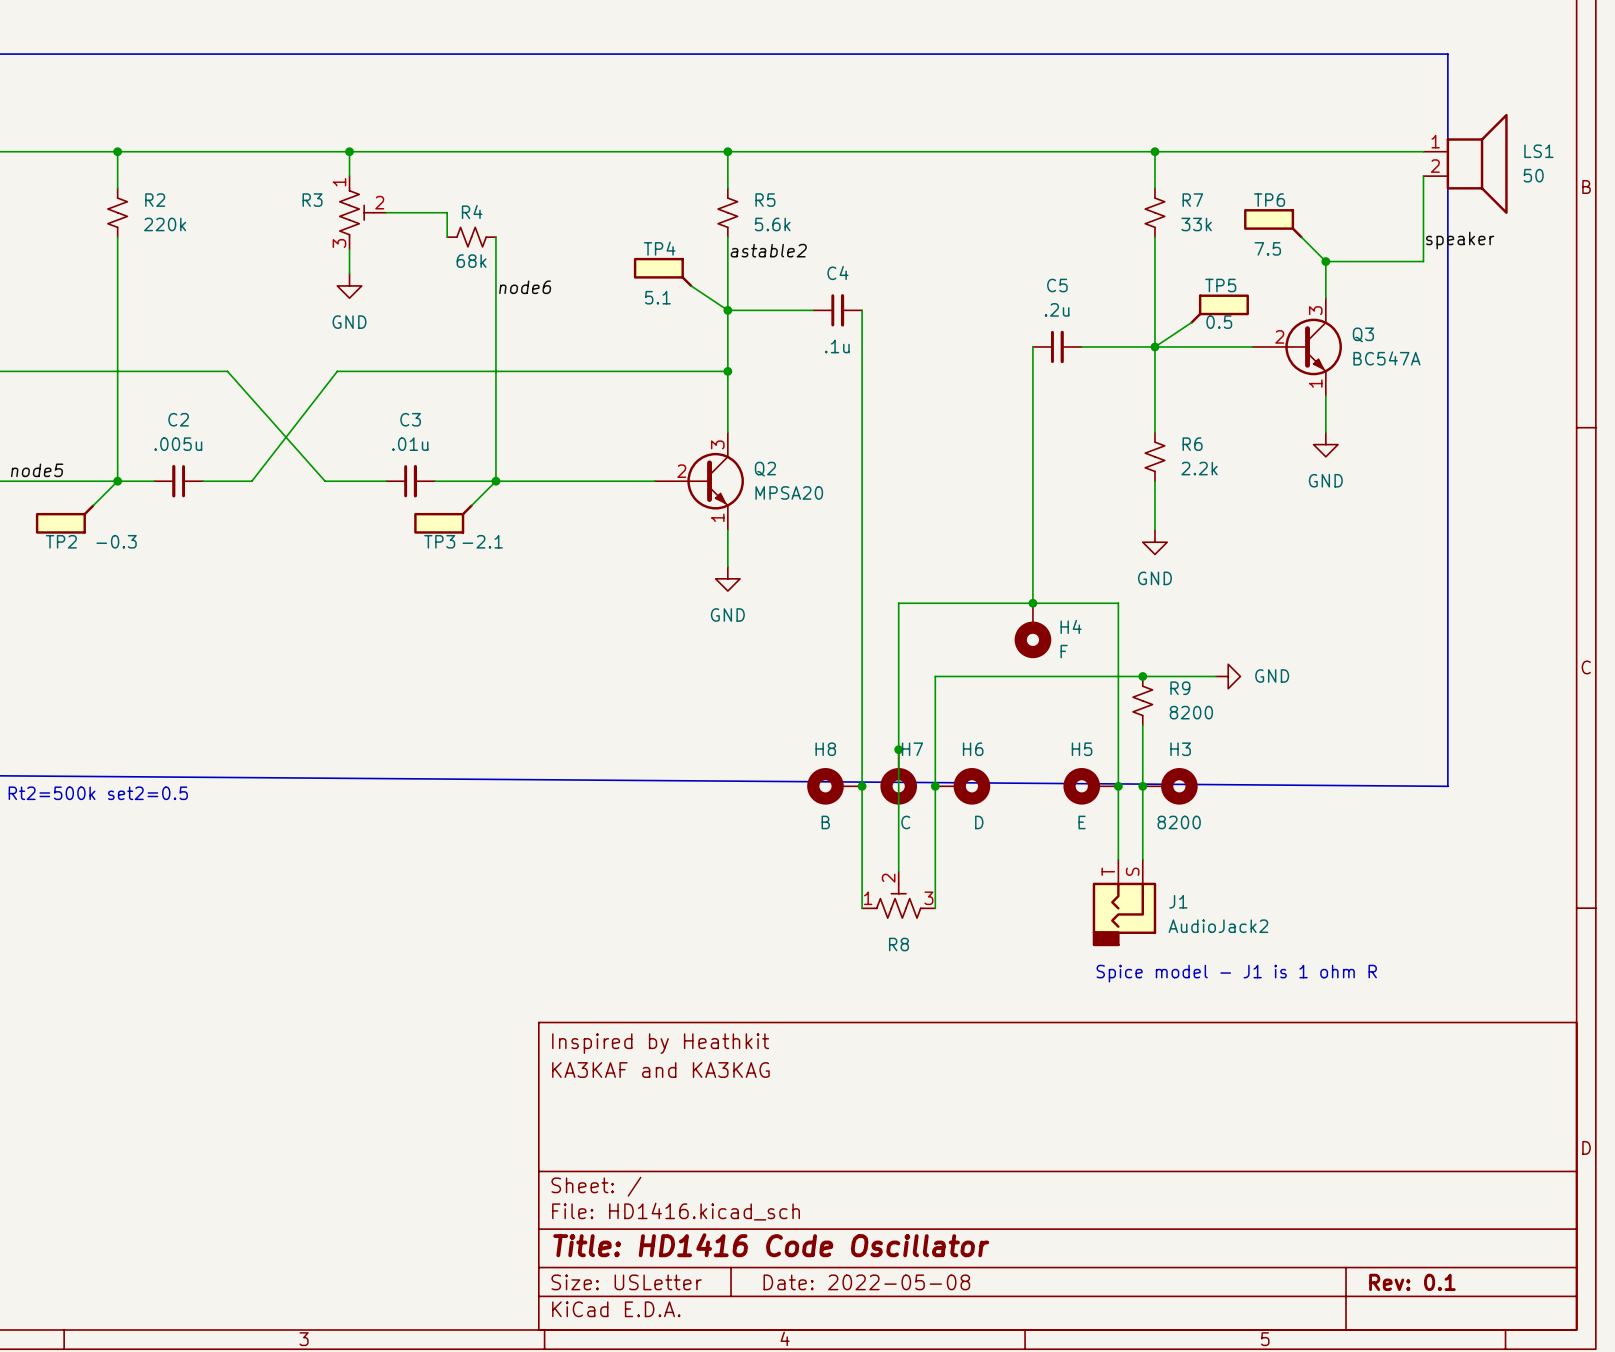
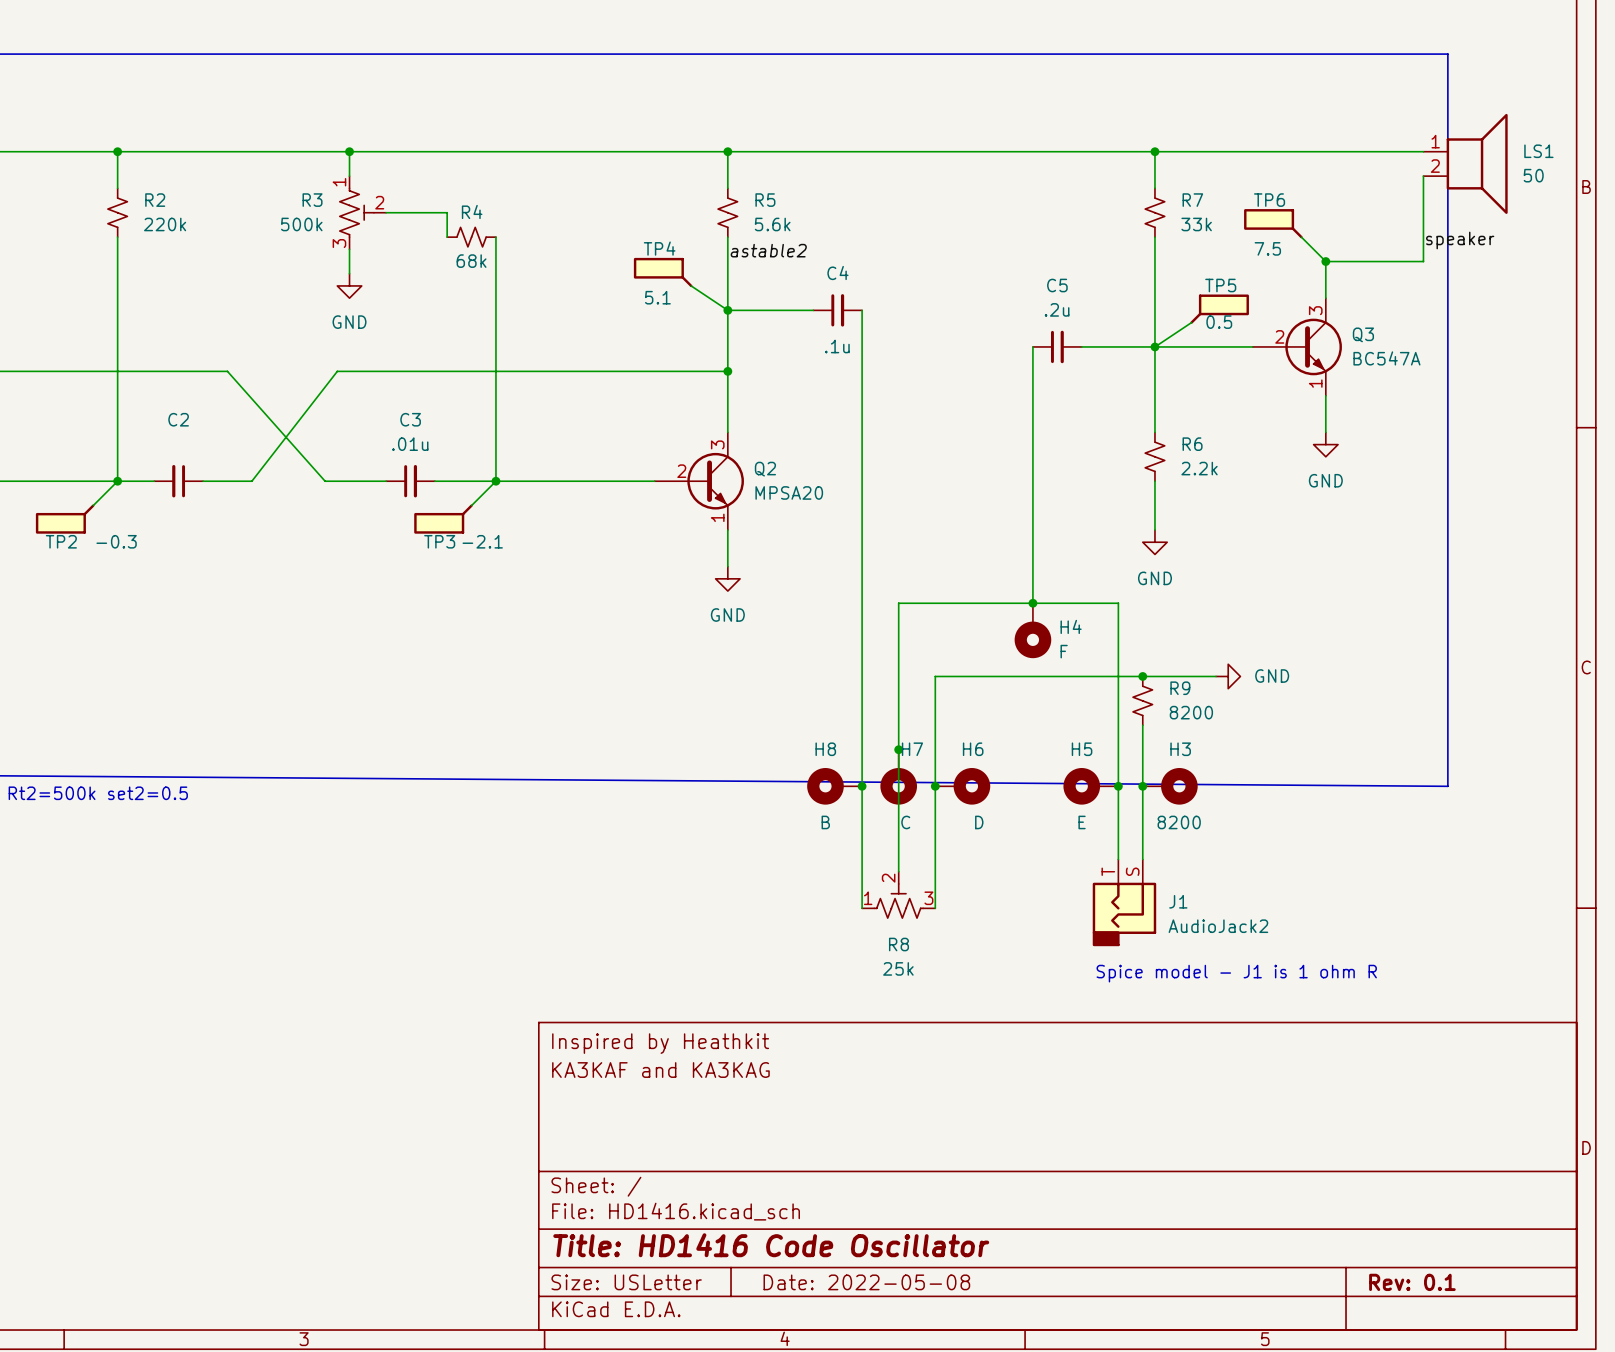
R3 value: none -> 500k (301, 224)
label: node6 (525, 287) -> none
C2 value: .005u (178, 444) -> none
label: node5 (37, 470) -> none
R8 value: none -> 25k (898, 968)

